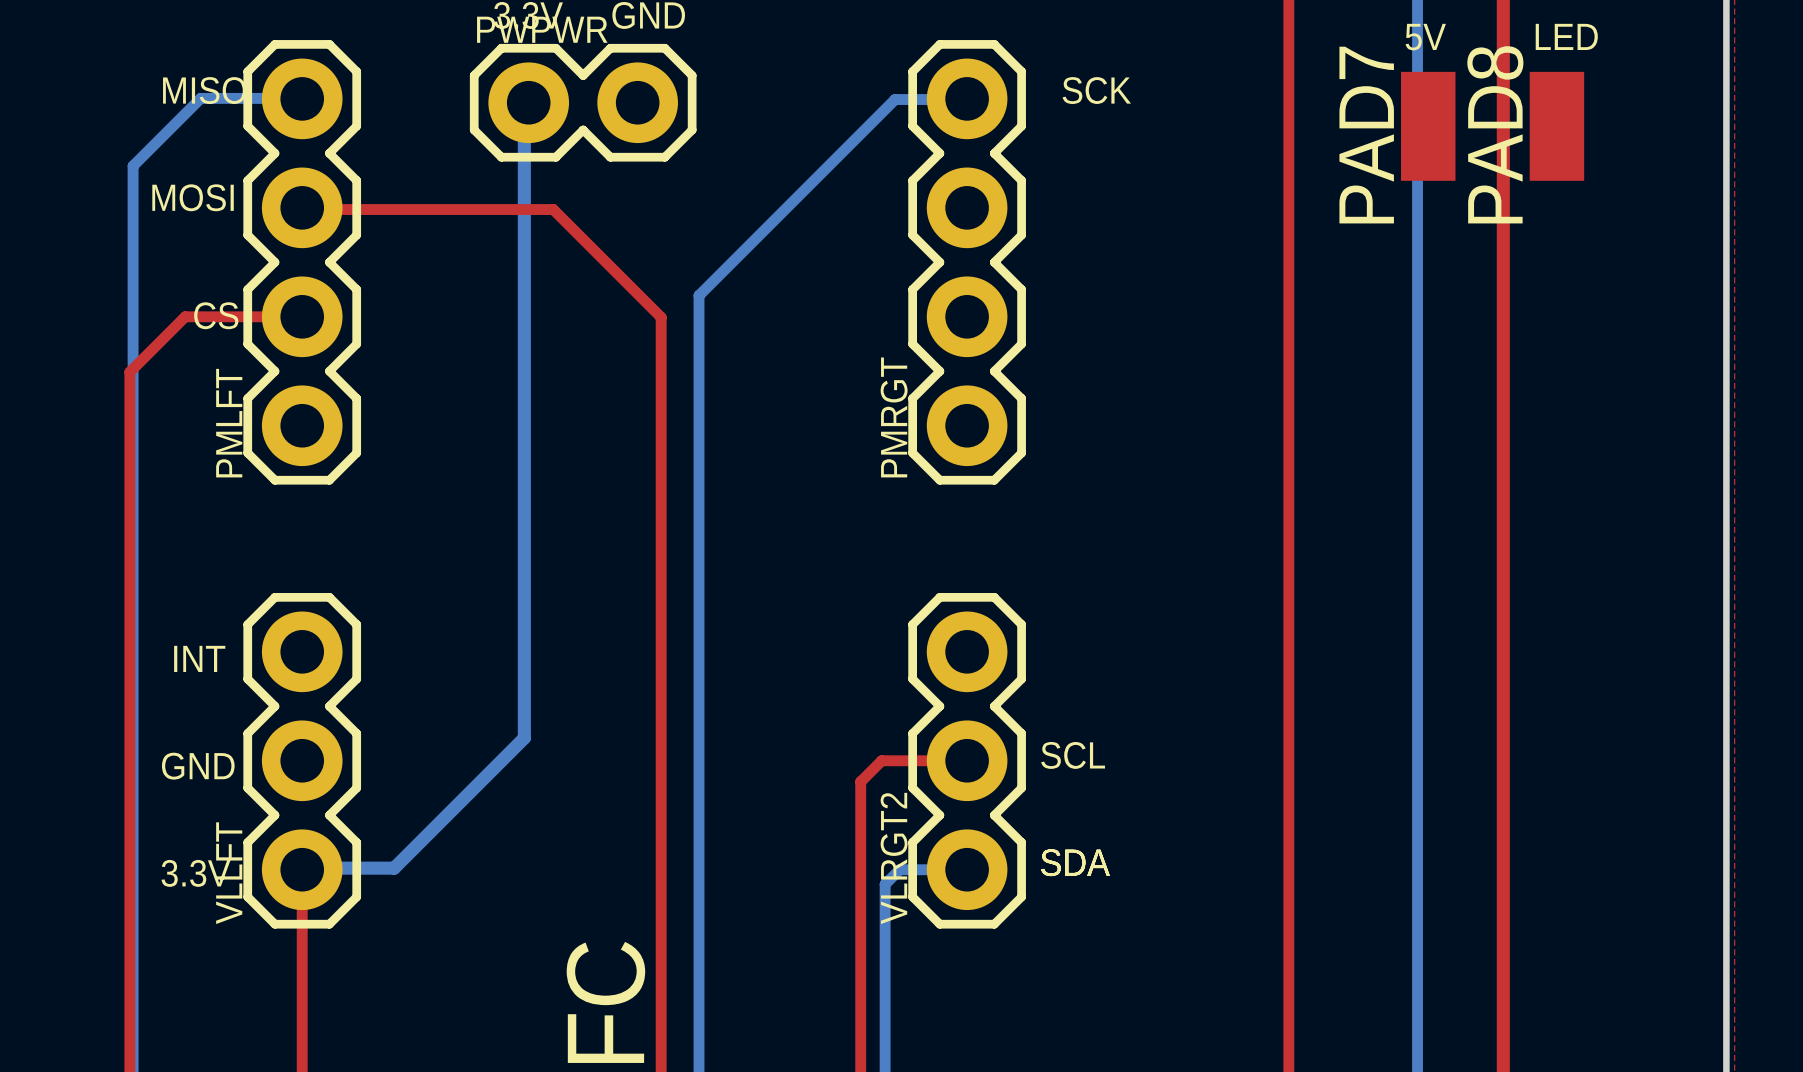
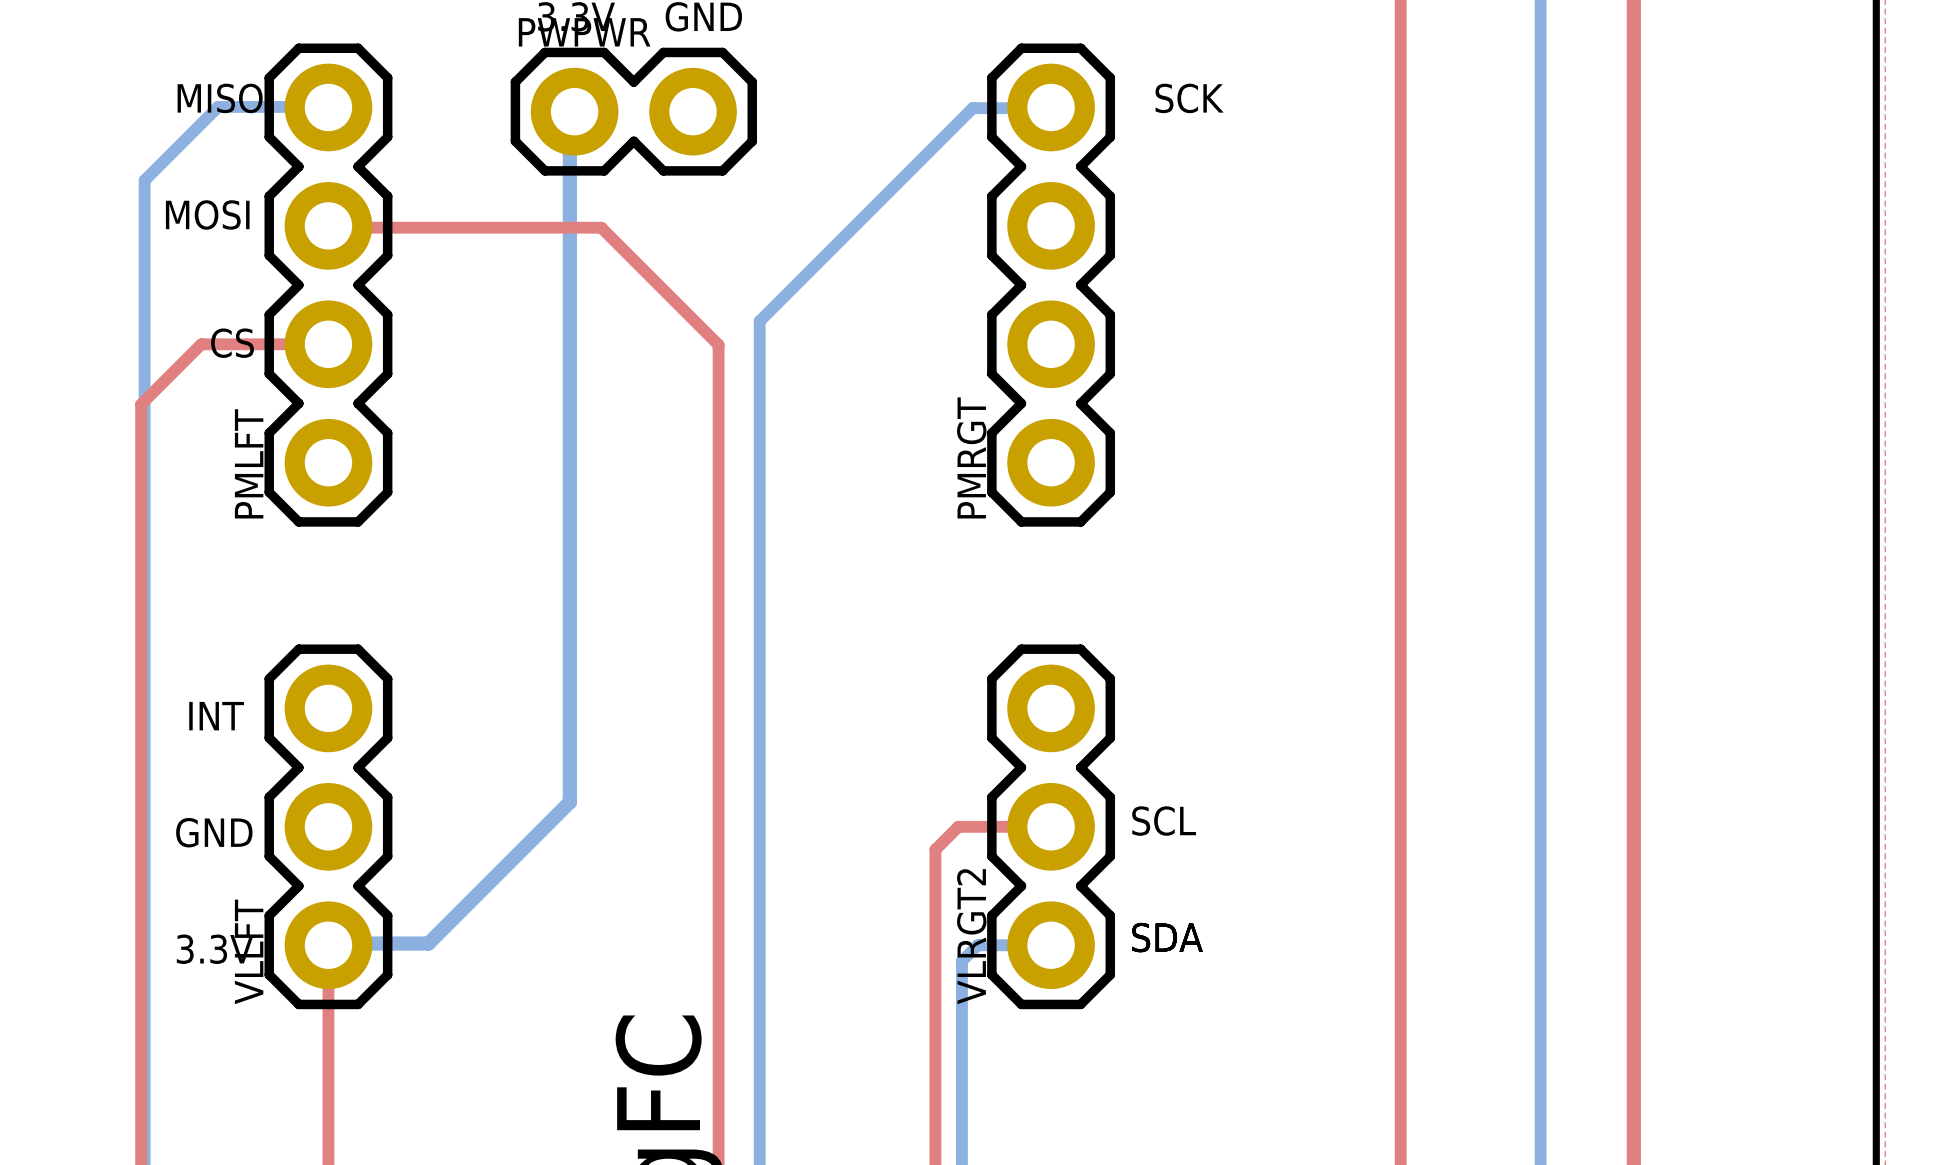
text: LED (1566, 36) -> none
text: 5V (1425, 37) -> none
PAD7: (1428, 126) -> none
PAD8: (1556, 126) -> none

